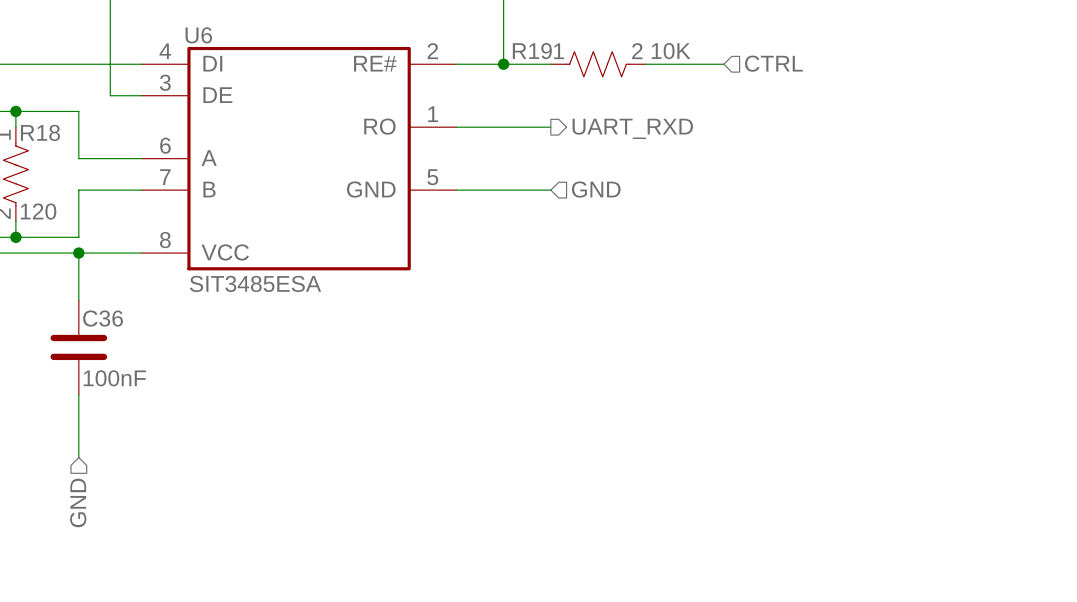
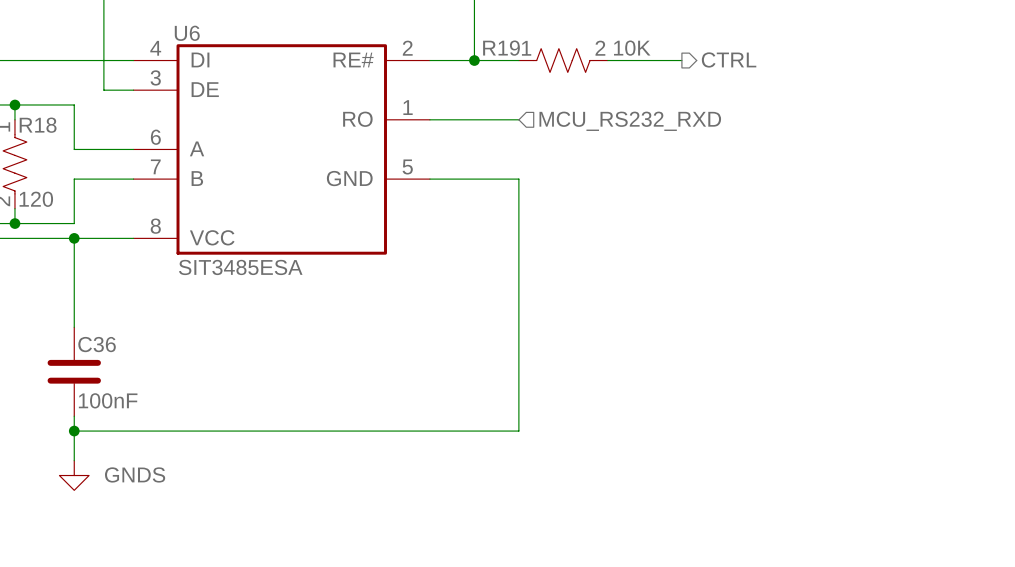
hierarchical label shape: input (773, 63) -> output (729, 59)
hierarchical label shape: output (632, 128) -> input (630, 121)
hierarchical label: UART_RXD (632, 128) -> MCU_RS232_RXD (630, 121)
hierarchical label: GND (596, 189) -> none
wire: none -> (518, 179) (518, 431) (74, 431) (74, 460)
C36 position: (78, 347) -> (74, 371)
junction: none -> (74, 431)
hierarchical label: GND (78, 502) -> none
power symbol: none -> GNDS (74, 475)

